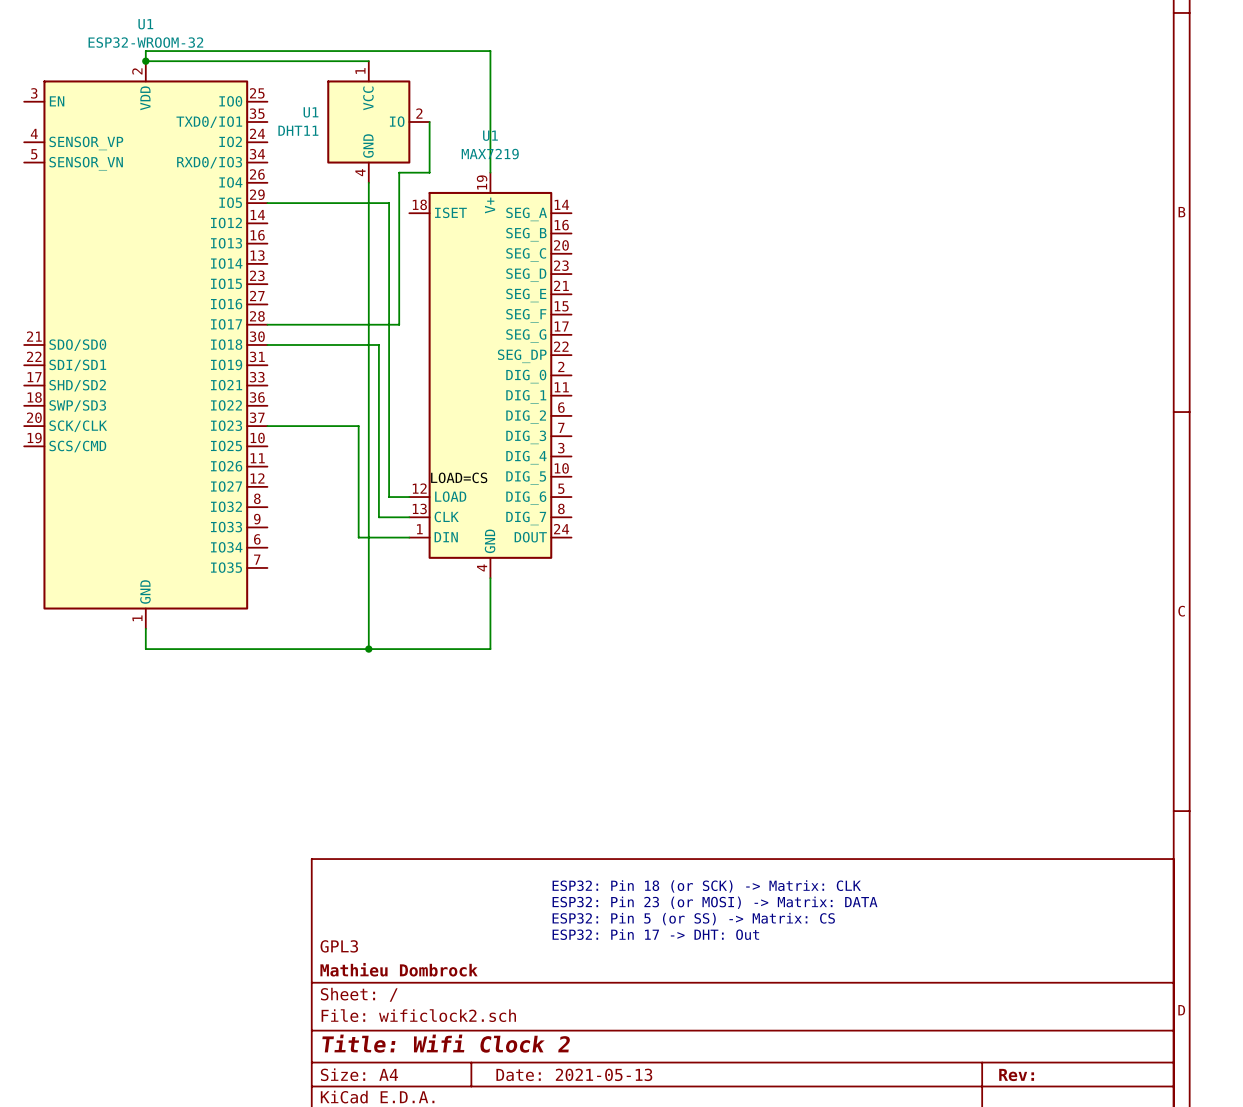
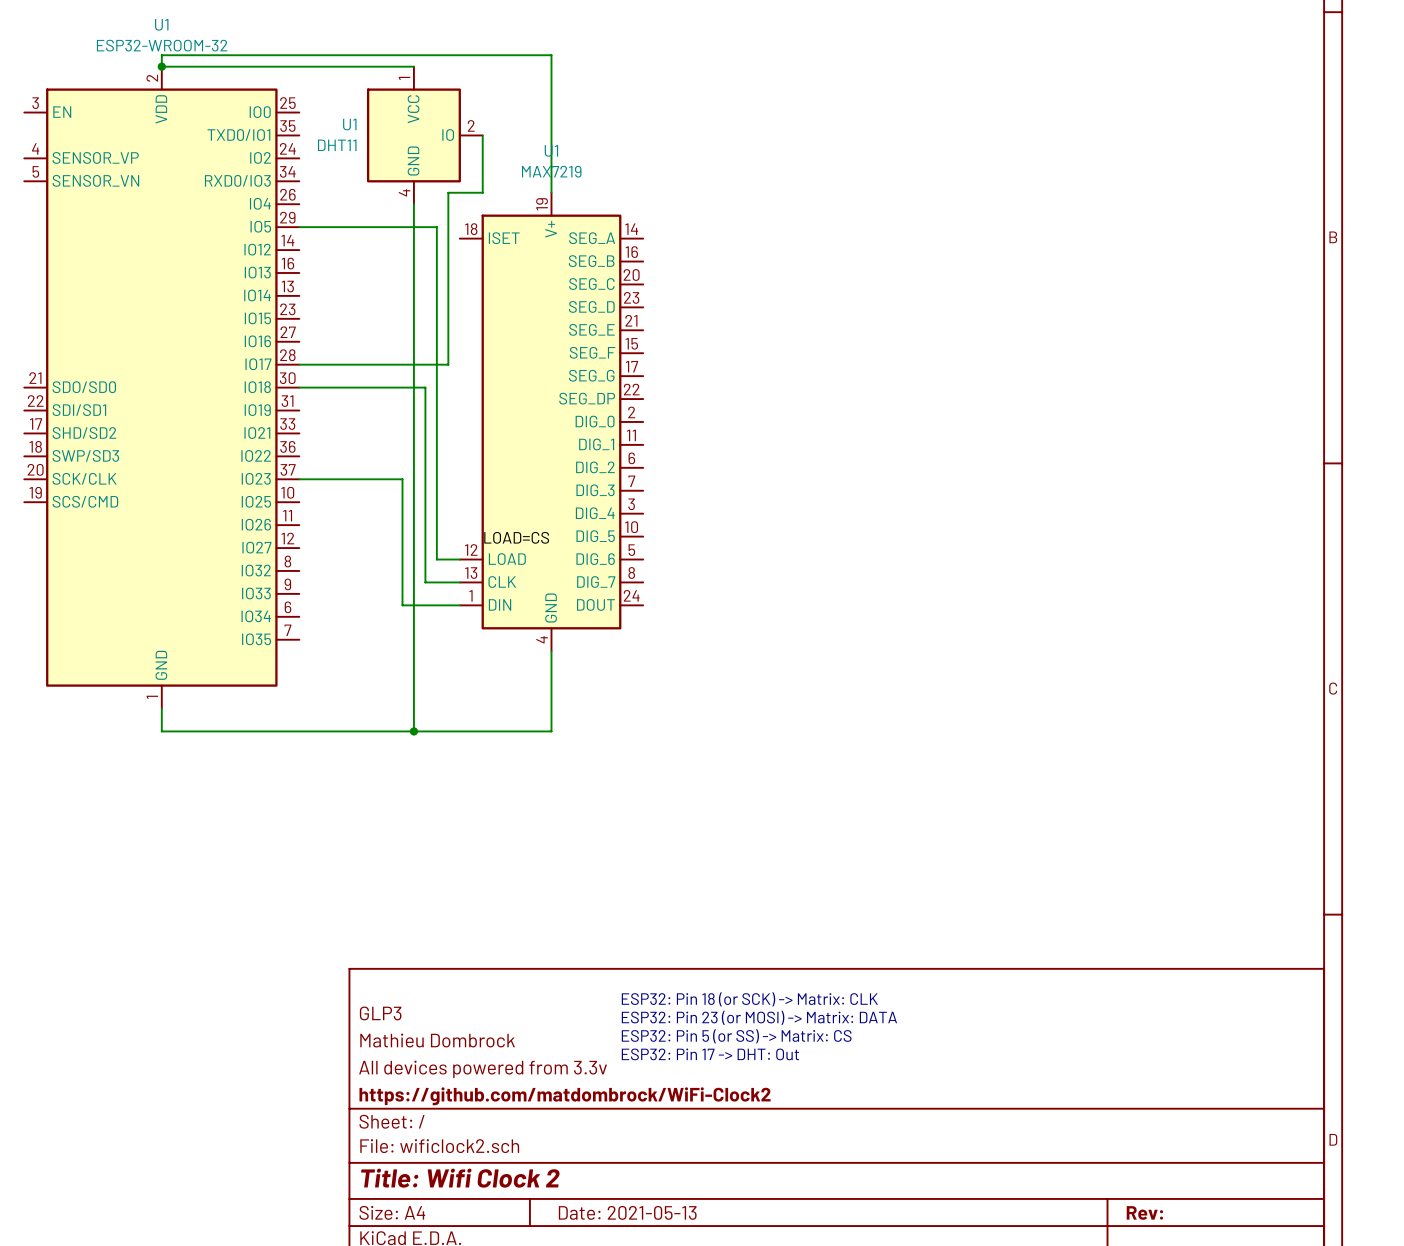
title block: none -> GLP3 (380, 1013)
title block: none -> Mathieu Dombrock (437, 1040)
title block: GPL3 (339, 946) -> All devices powered from 3.3v (483, 1069)
title block: Mathieu Dombrock (399, 969) -> https://github.com/matdombrock/WiFi-Clock2 (565, 1096)

